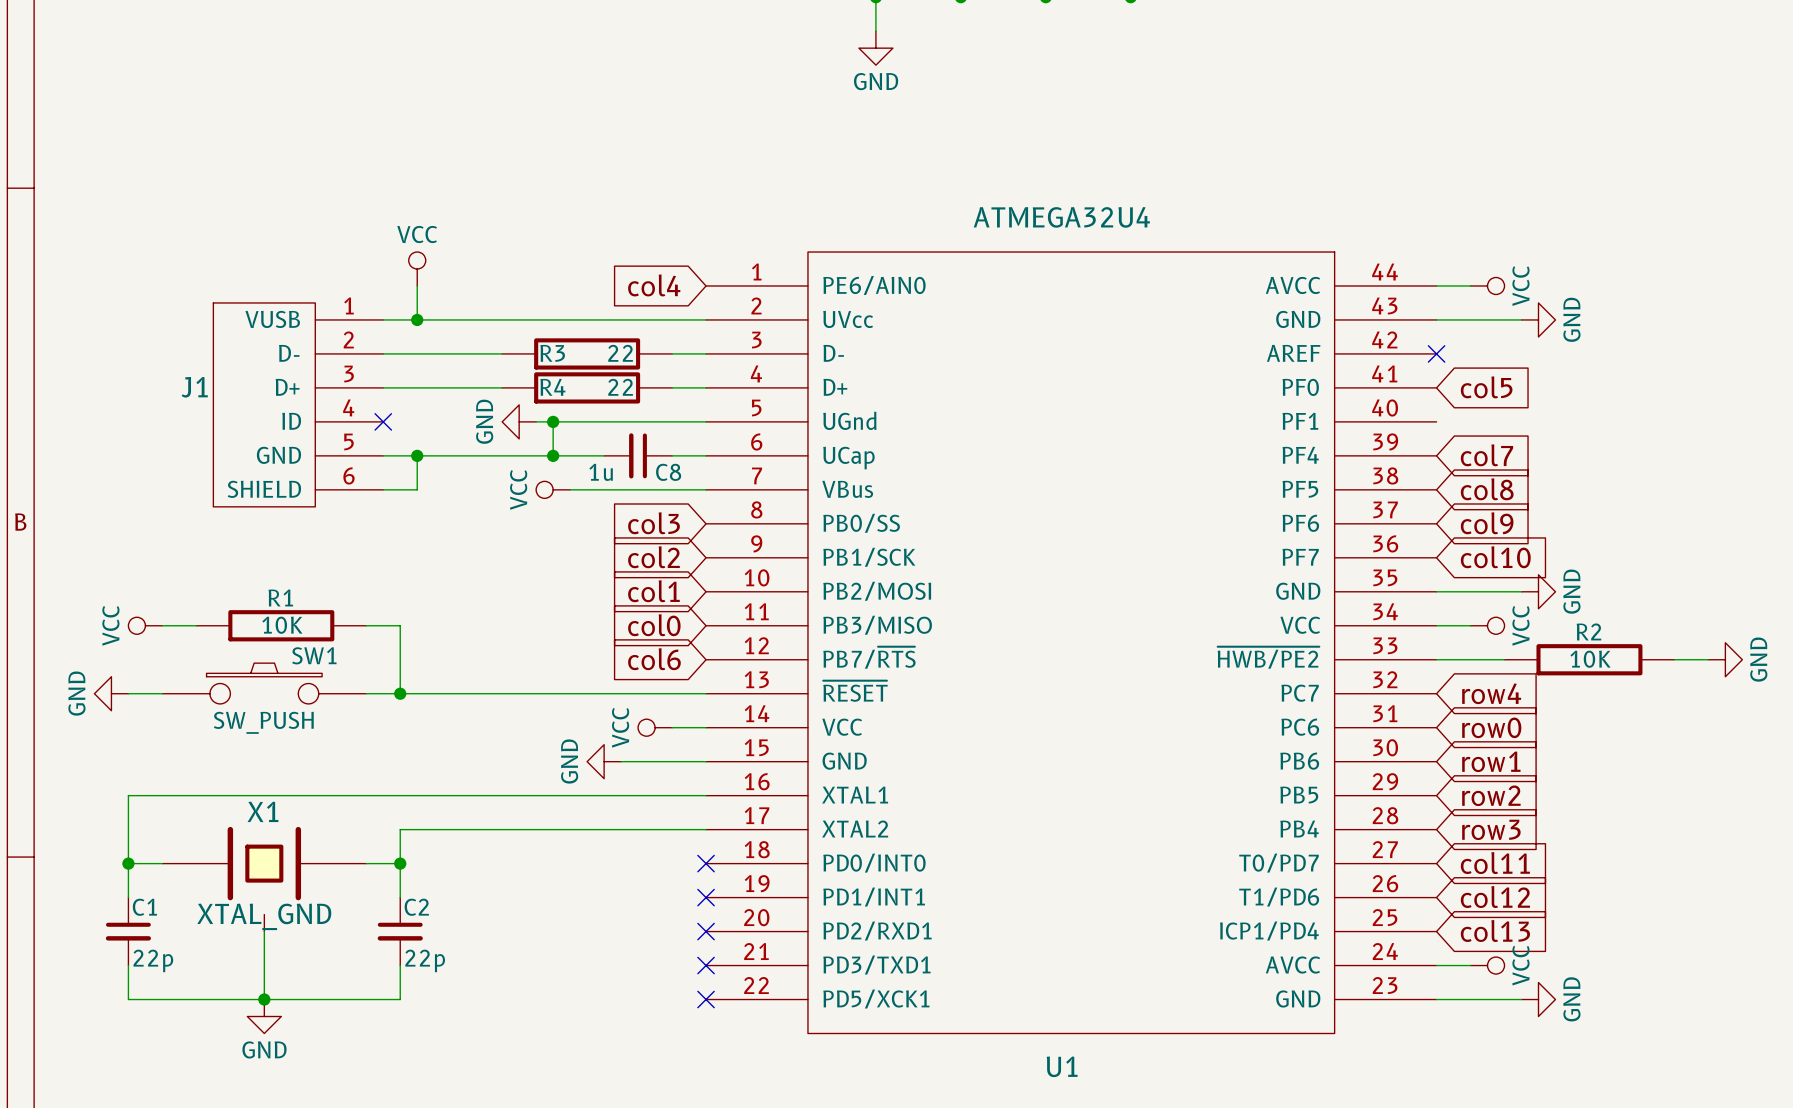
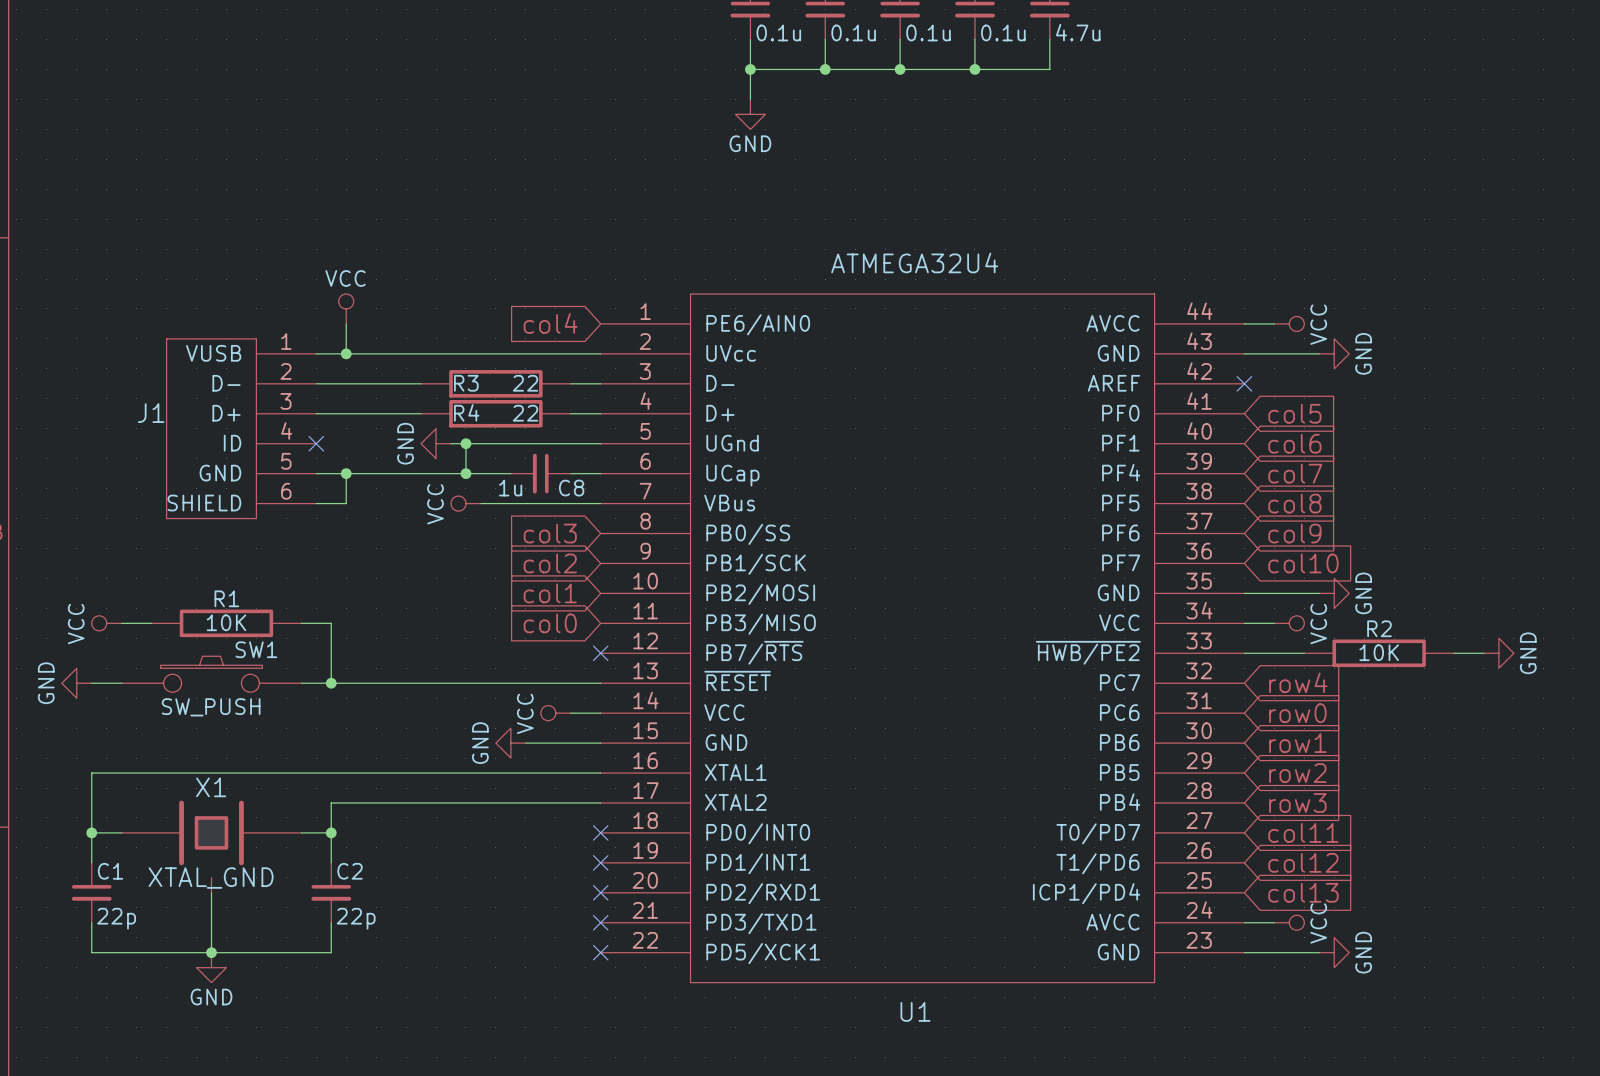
global label: none -> col6 (1294, 443)
global label: col6 (654, 659) -> none
no-connect mark: none -> (600, 653)

